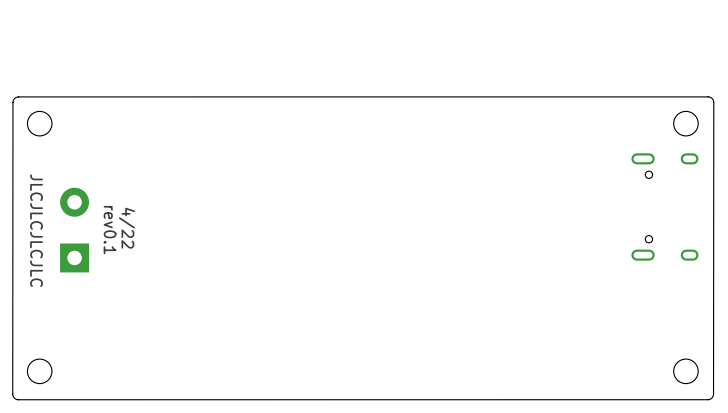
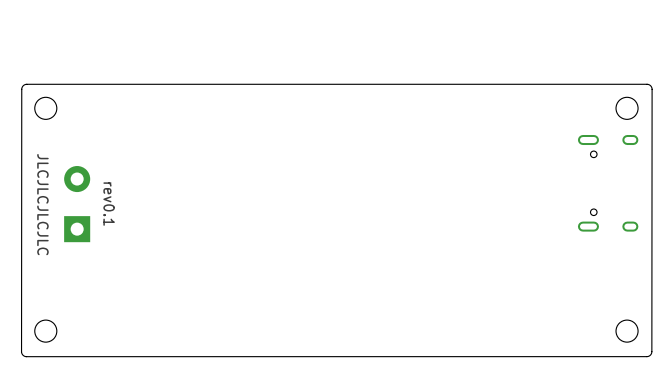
text: 4/22 (126, 228) -> none

